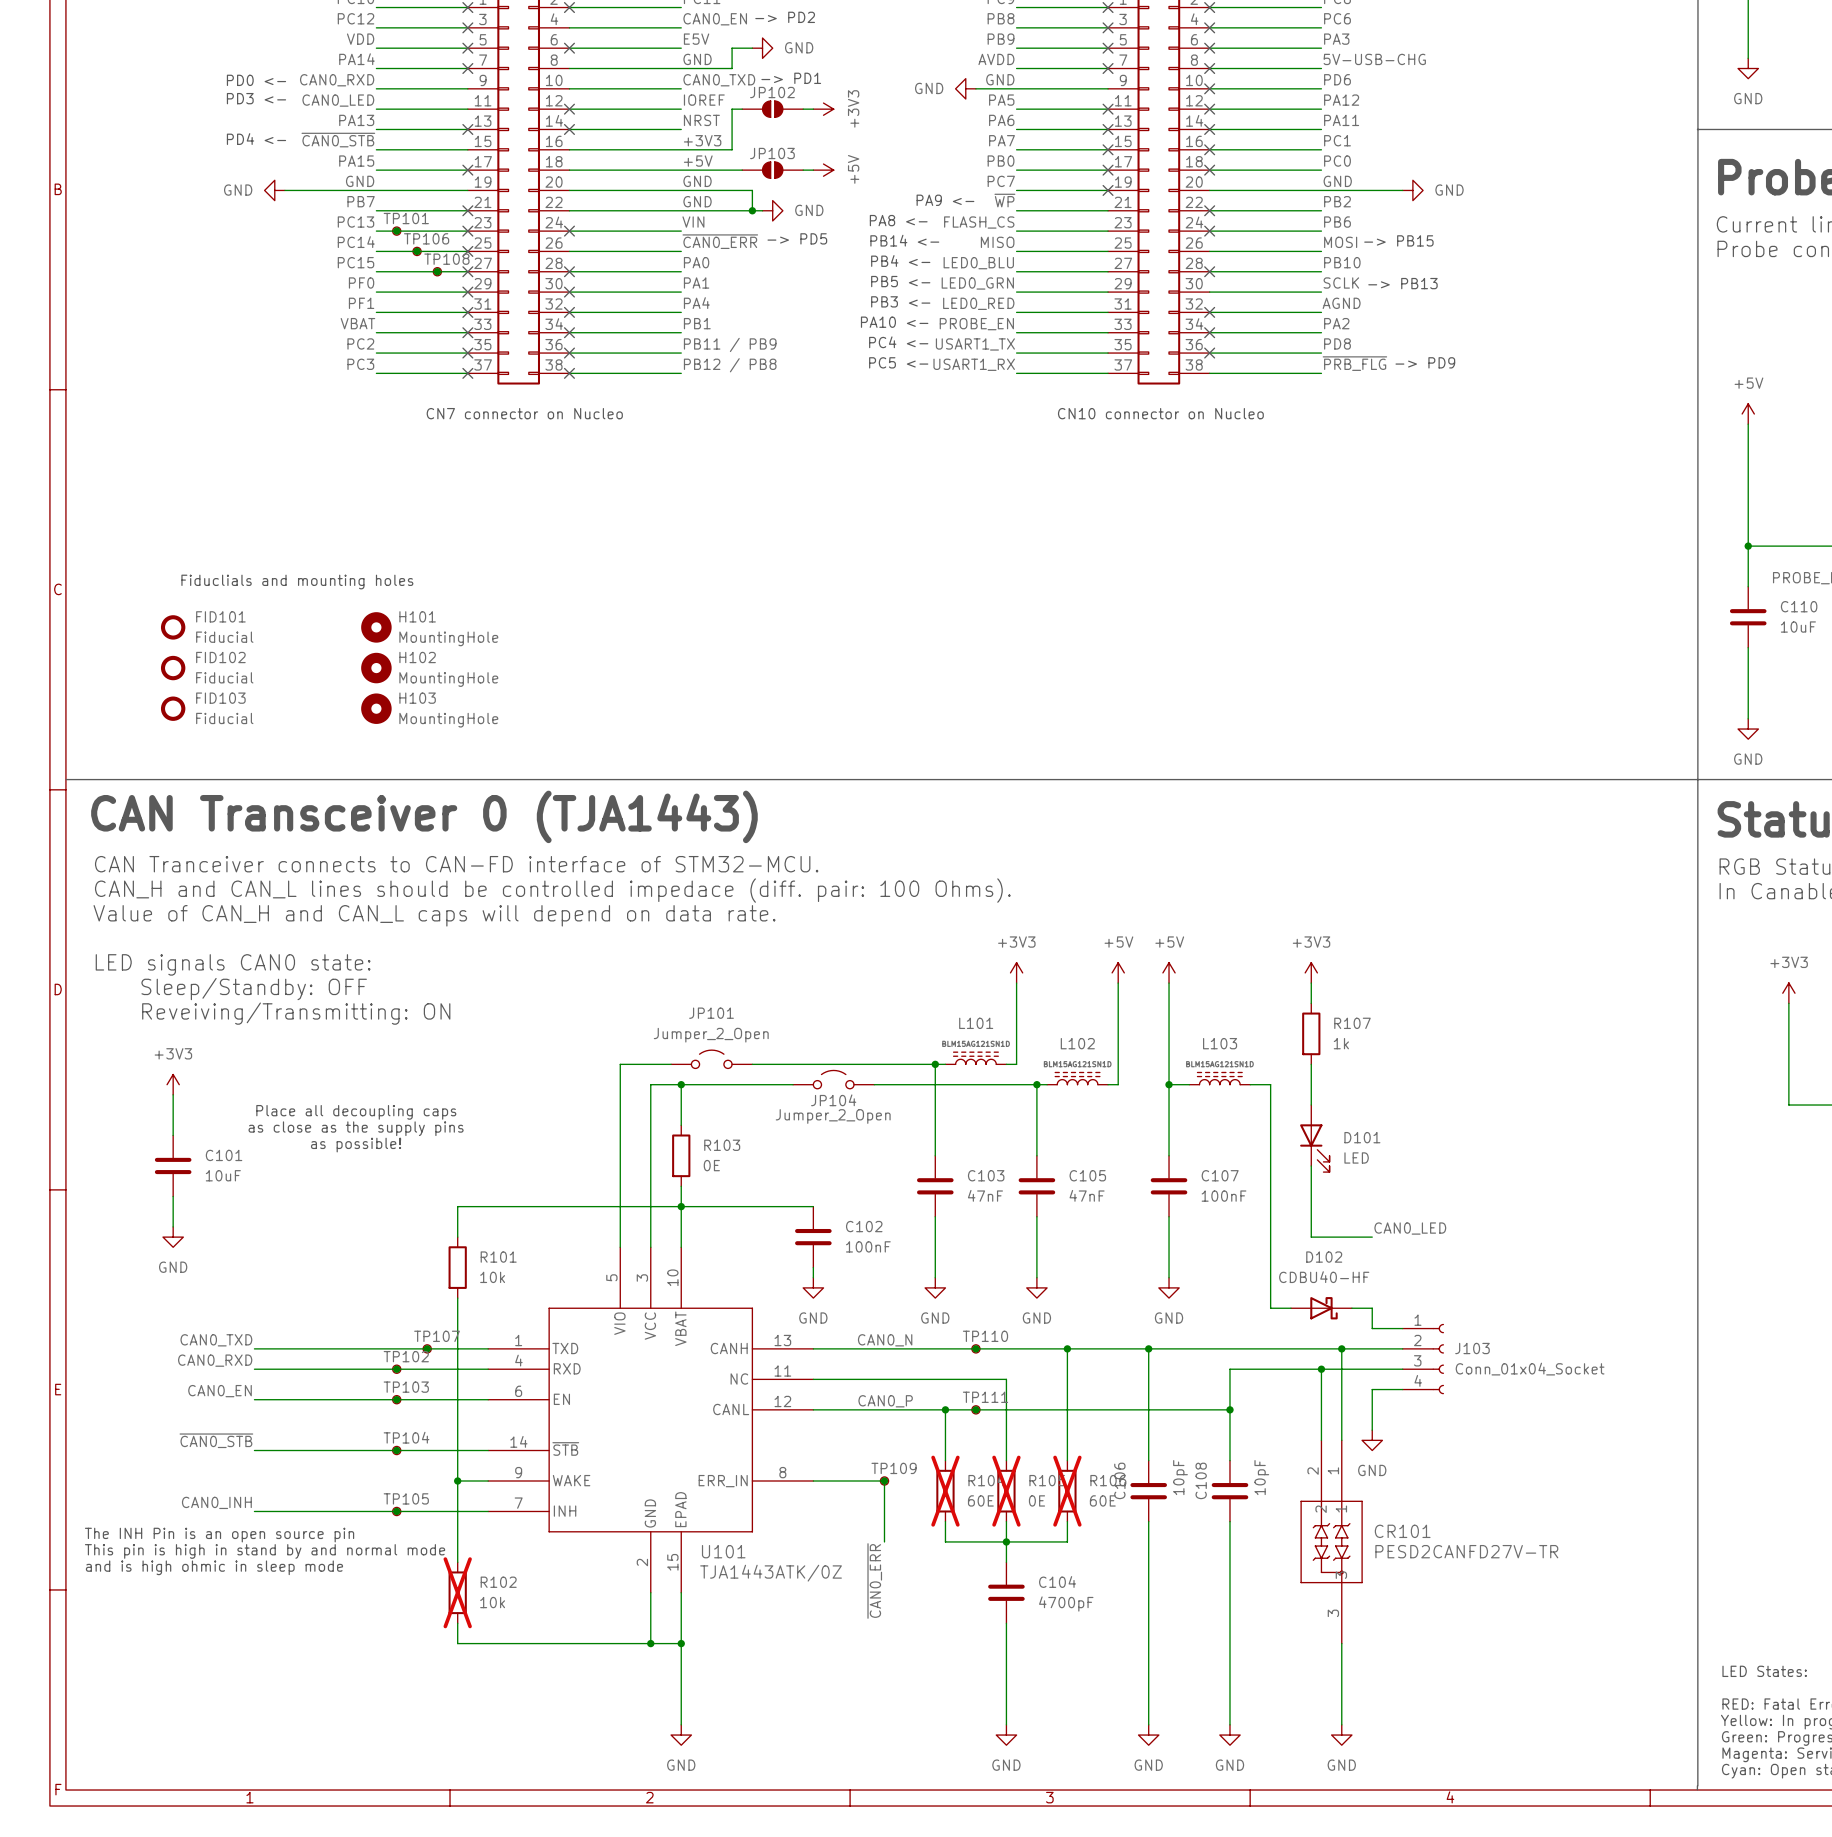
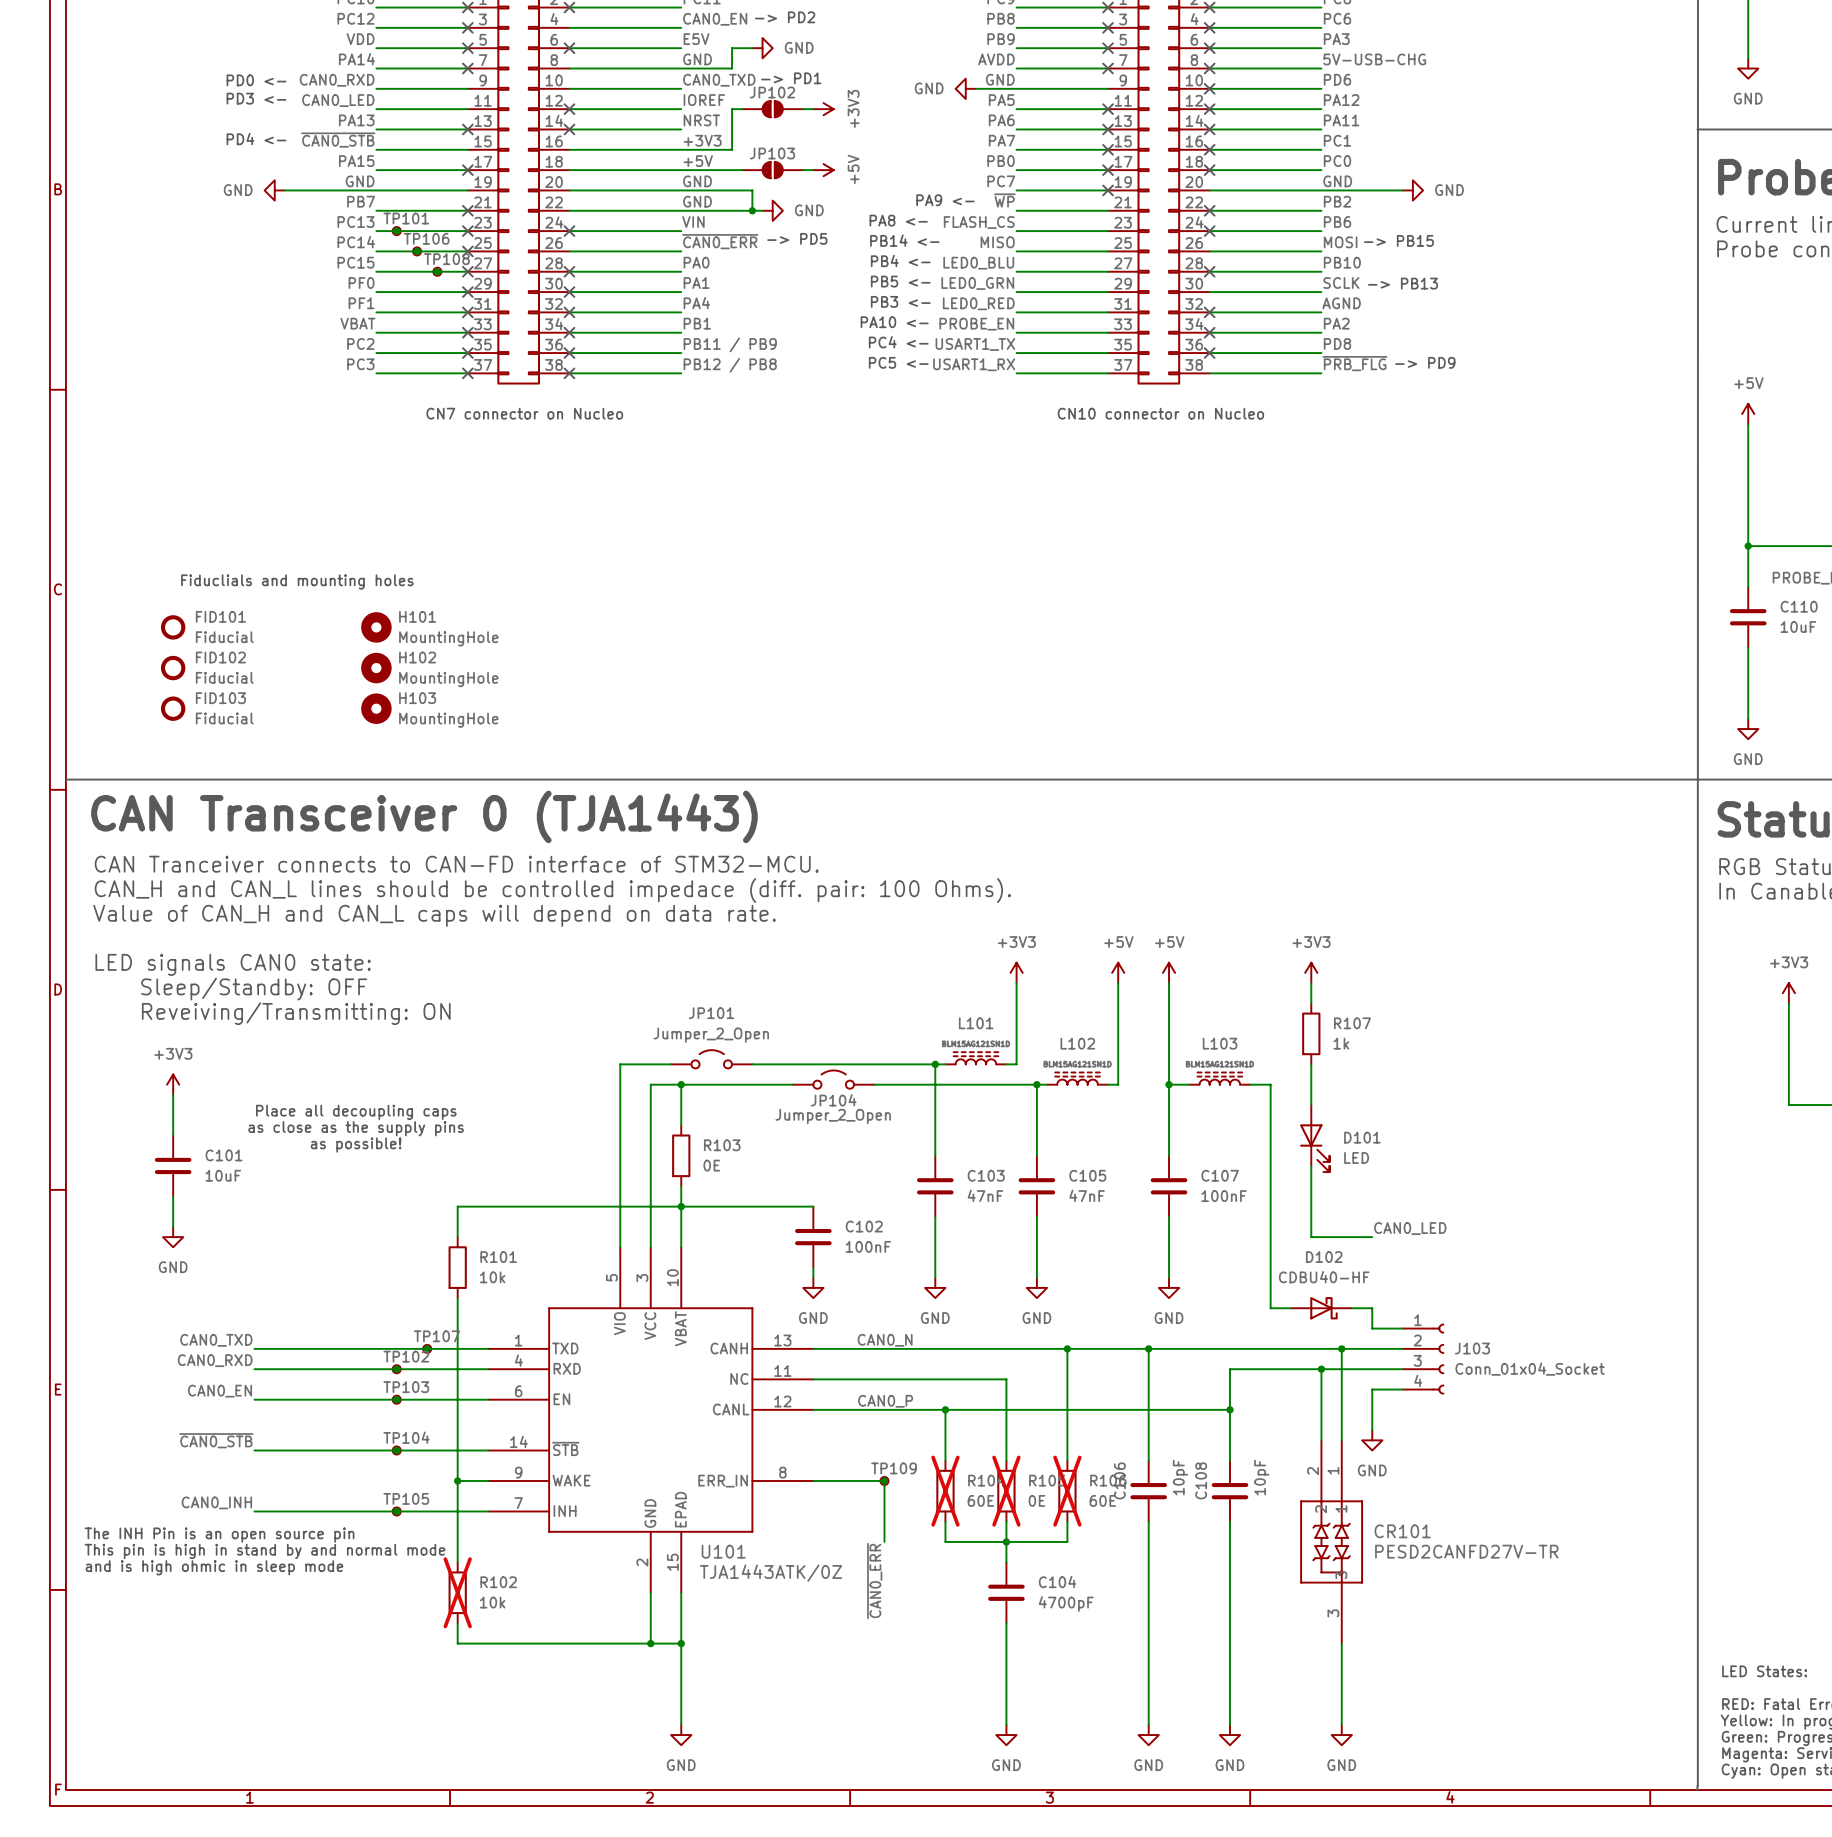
junction: (975, 1348) -> none
TP110: (975, 1348) -> none
junction: (975, 1409) -> none
TP111: (975, 1409) -> none

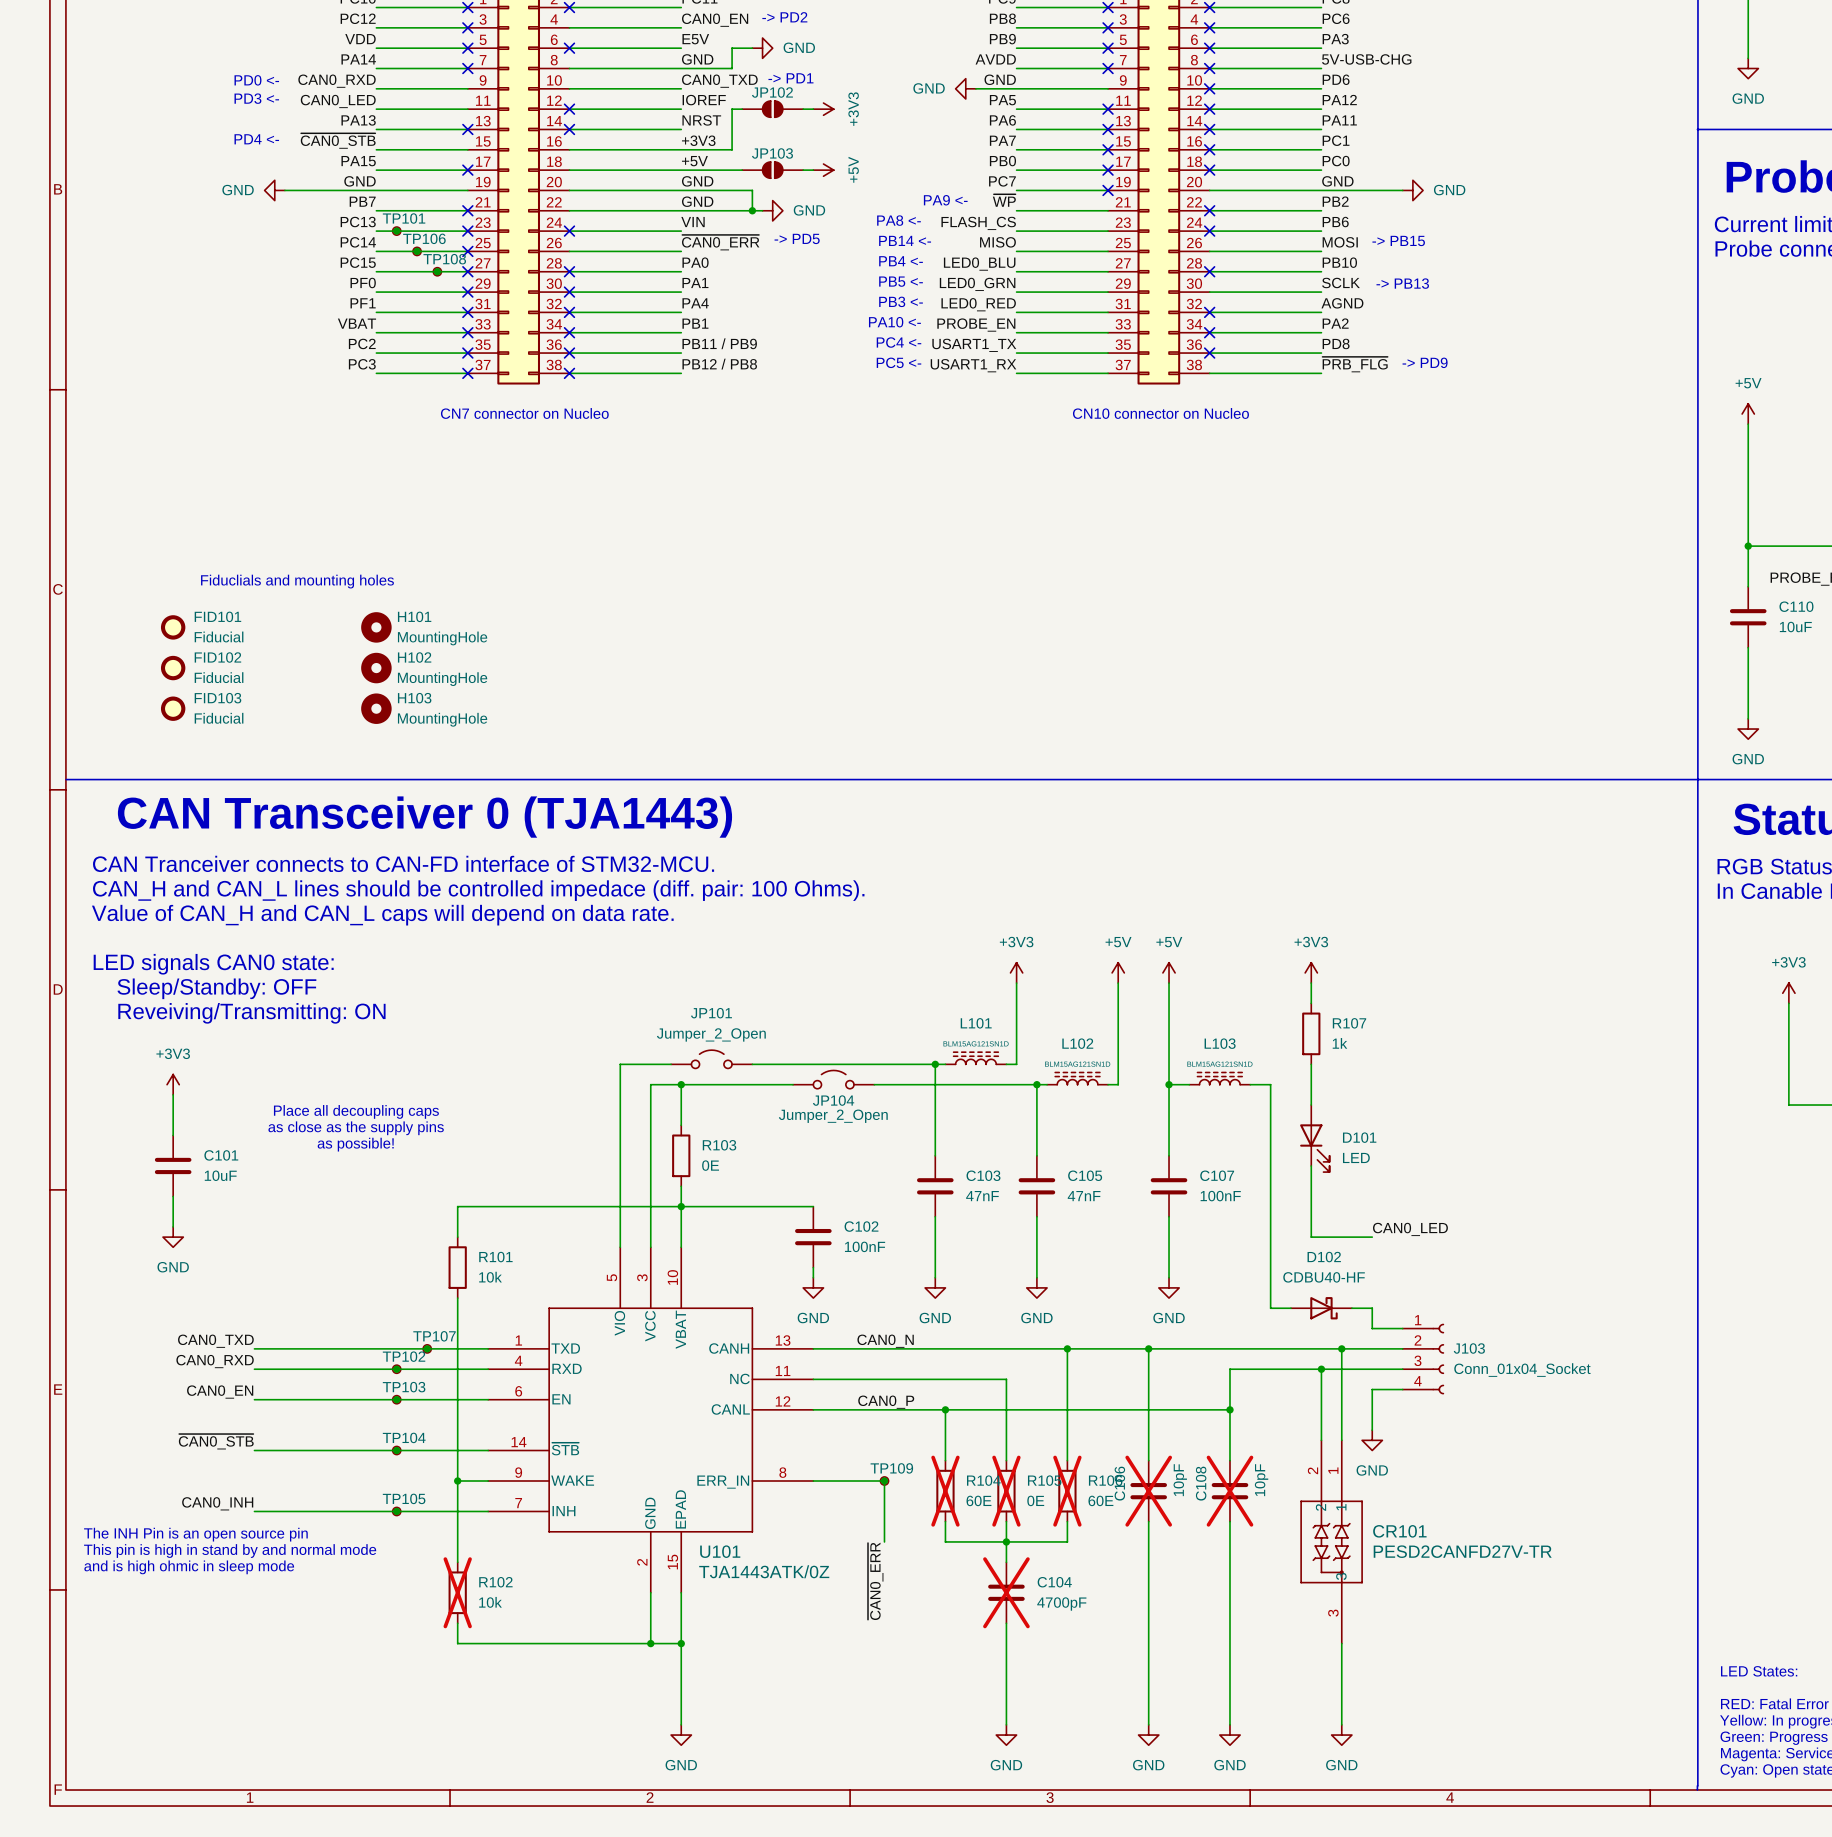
C106 do-not-place cross: none -> (1148, 1491)
C108 do-not-place cross: none -> (1229, 1491)
C104 do-not-place cross: none -> (1006, 1592)

